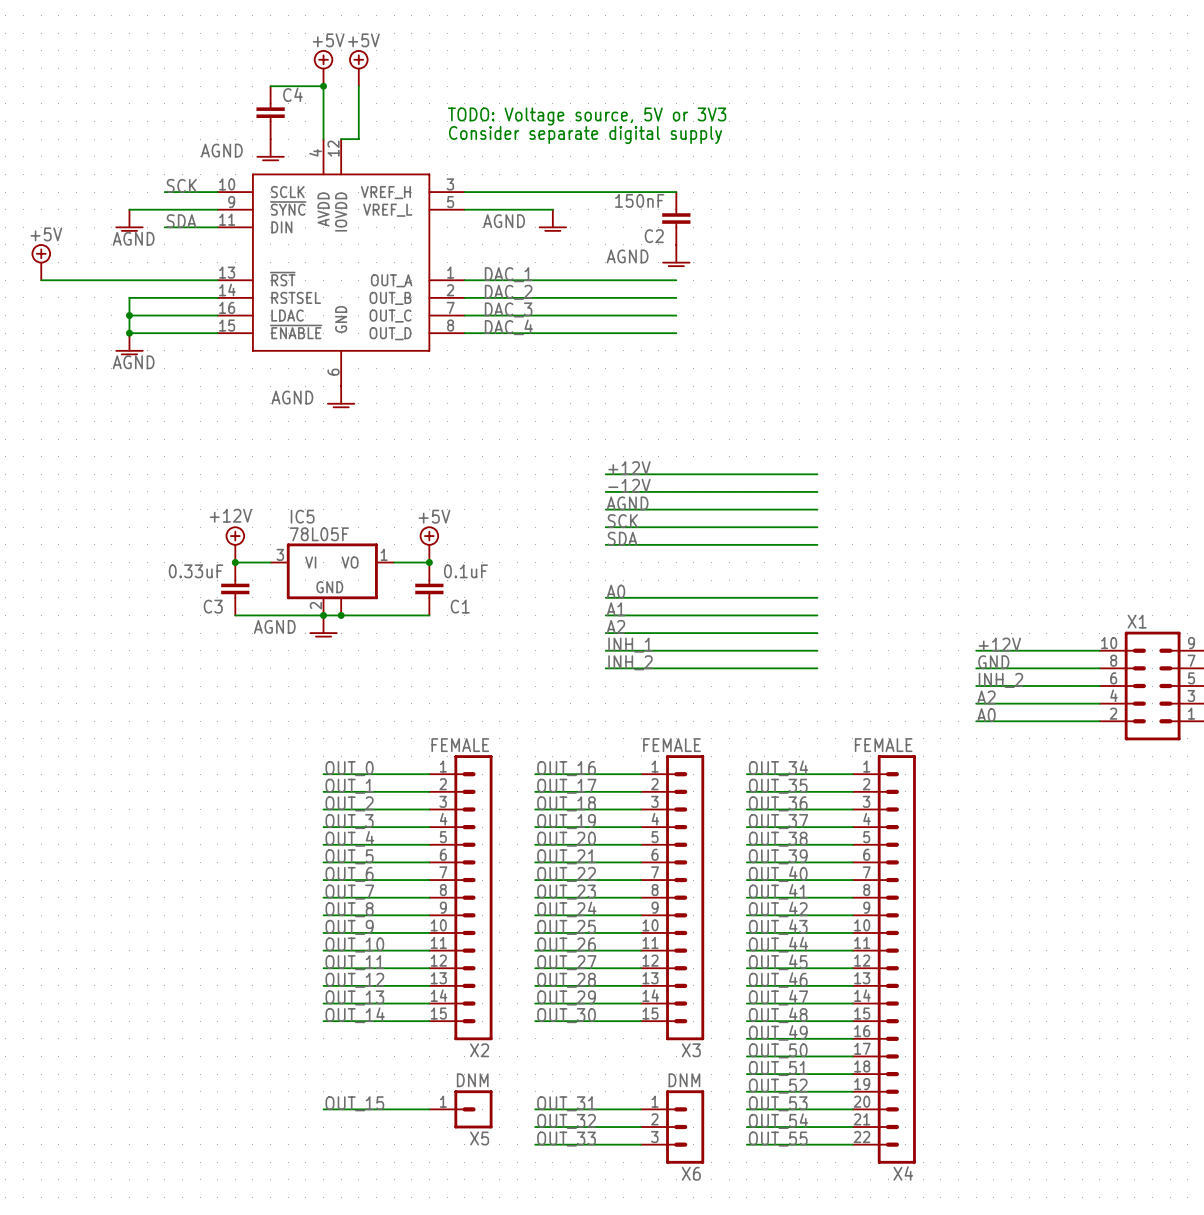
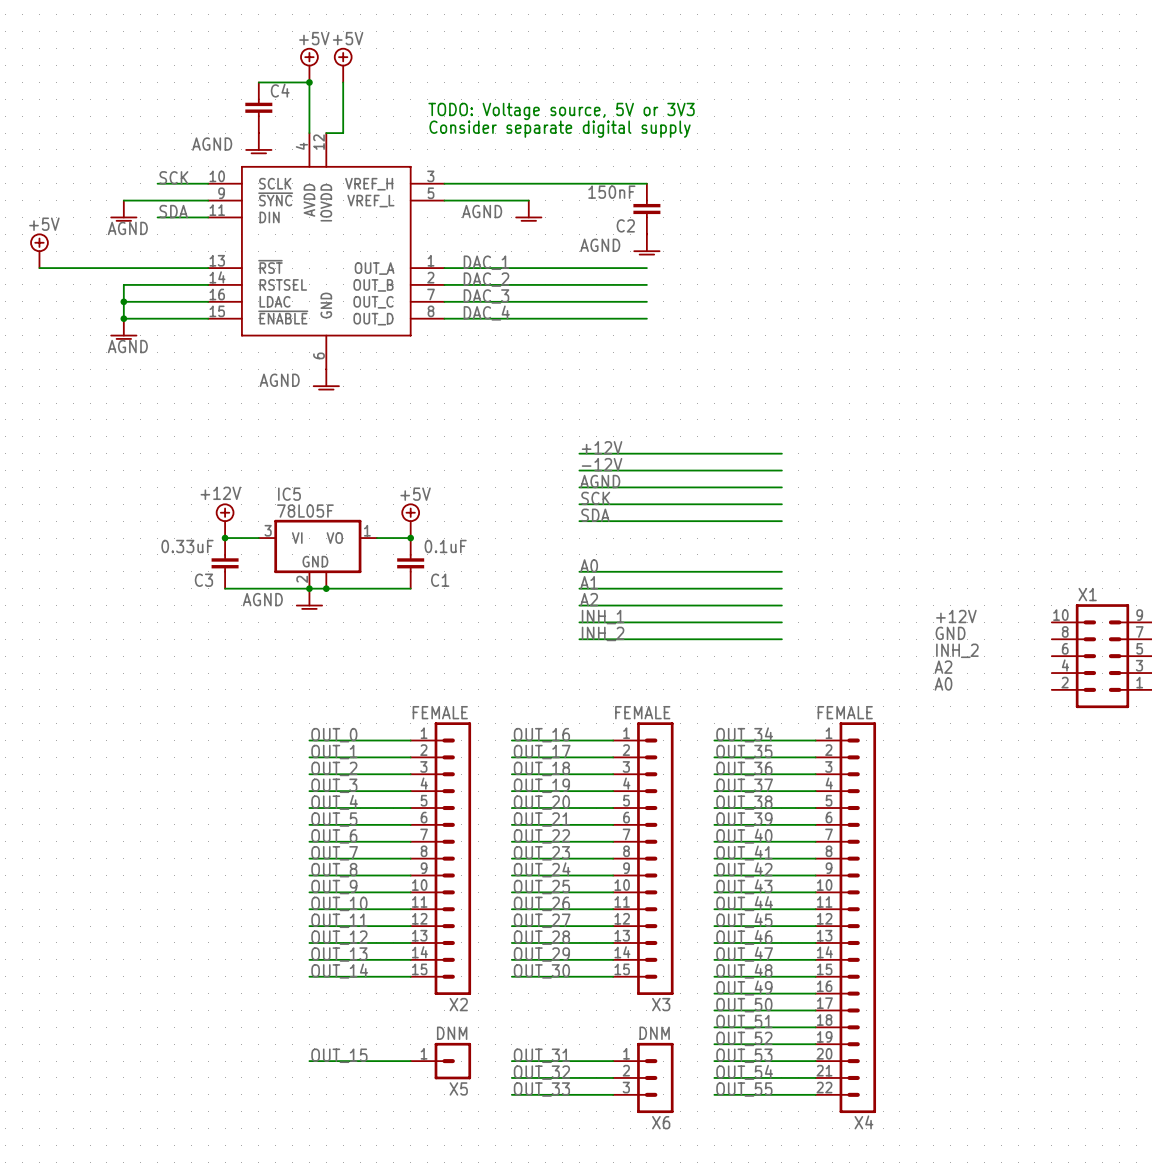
wire: (976, 650) (1099, 650) -> none
wire: (976, 668) (1099, 668) -> none
wire: (976, 686) (1099, 686) -> none
wire: (976, 703) (1099, 703) -> none
wire: (976, 721) (1099, 721) -> none

